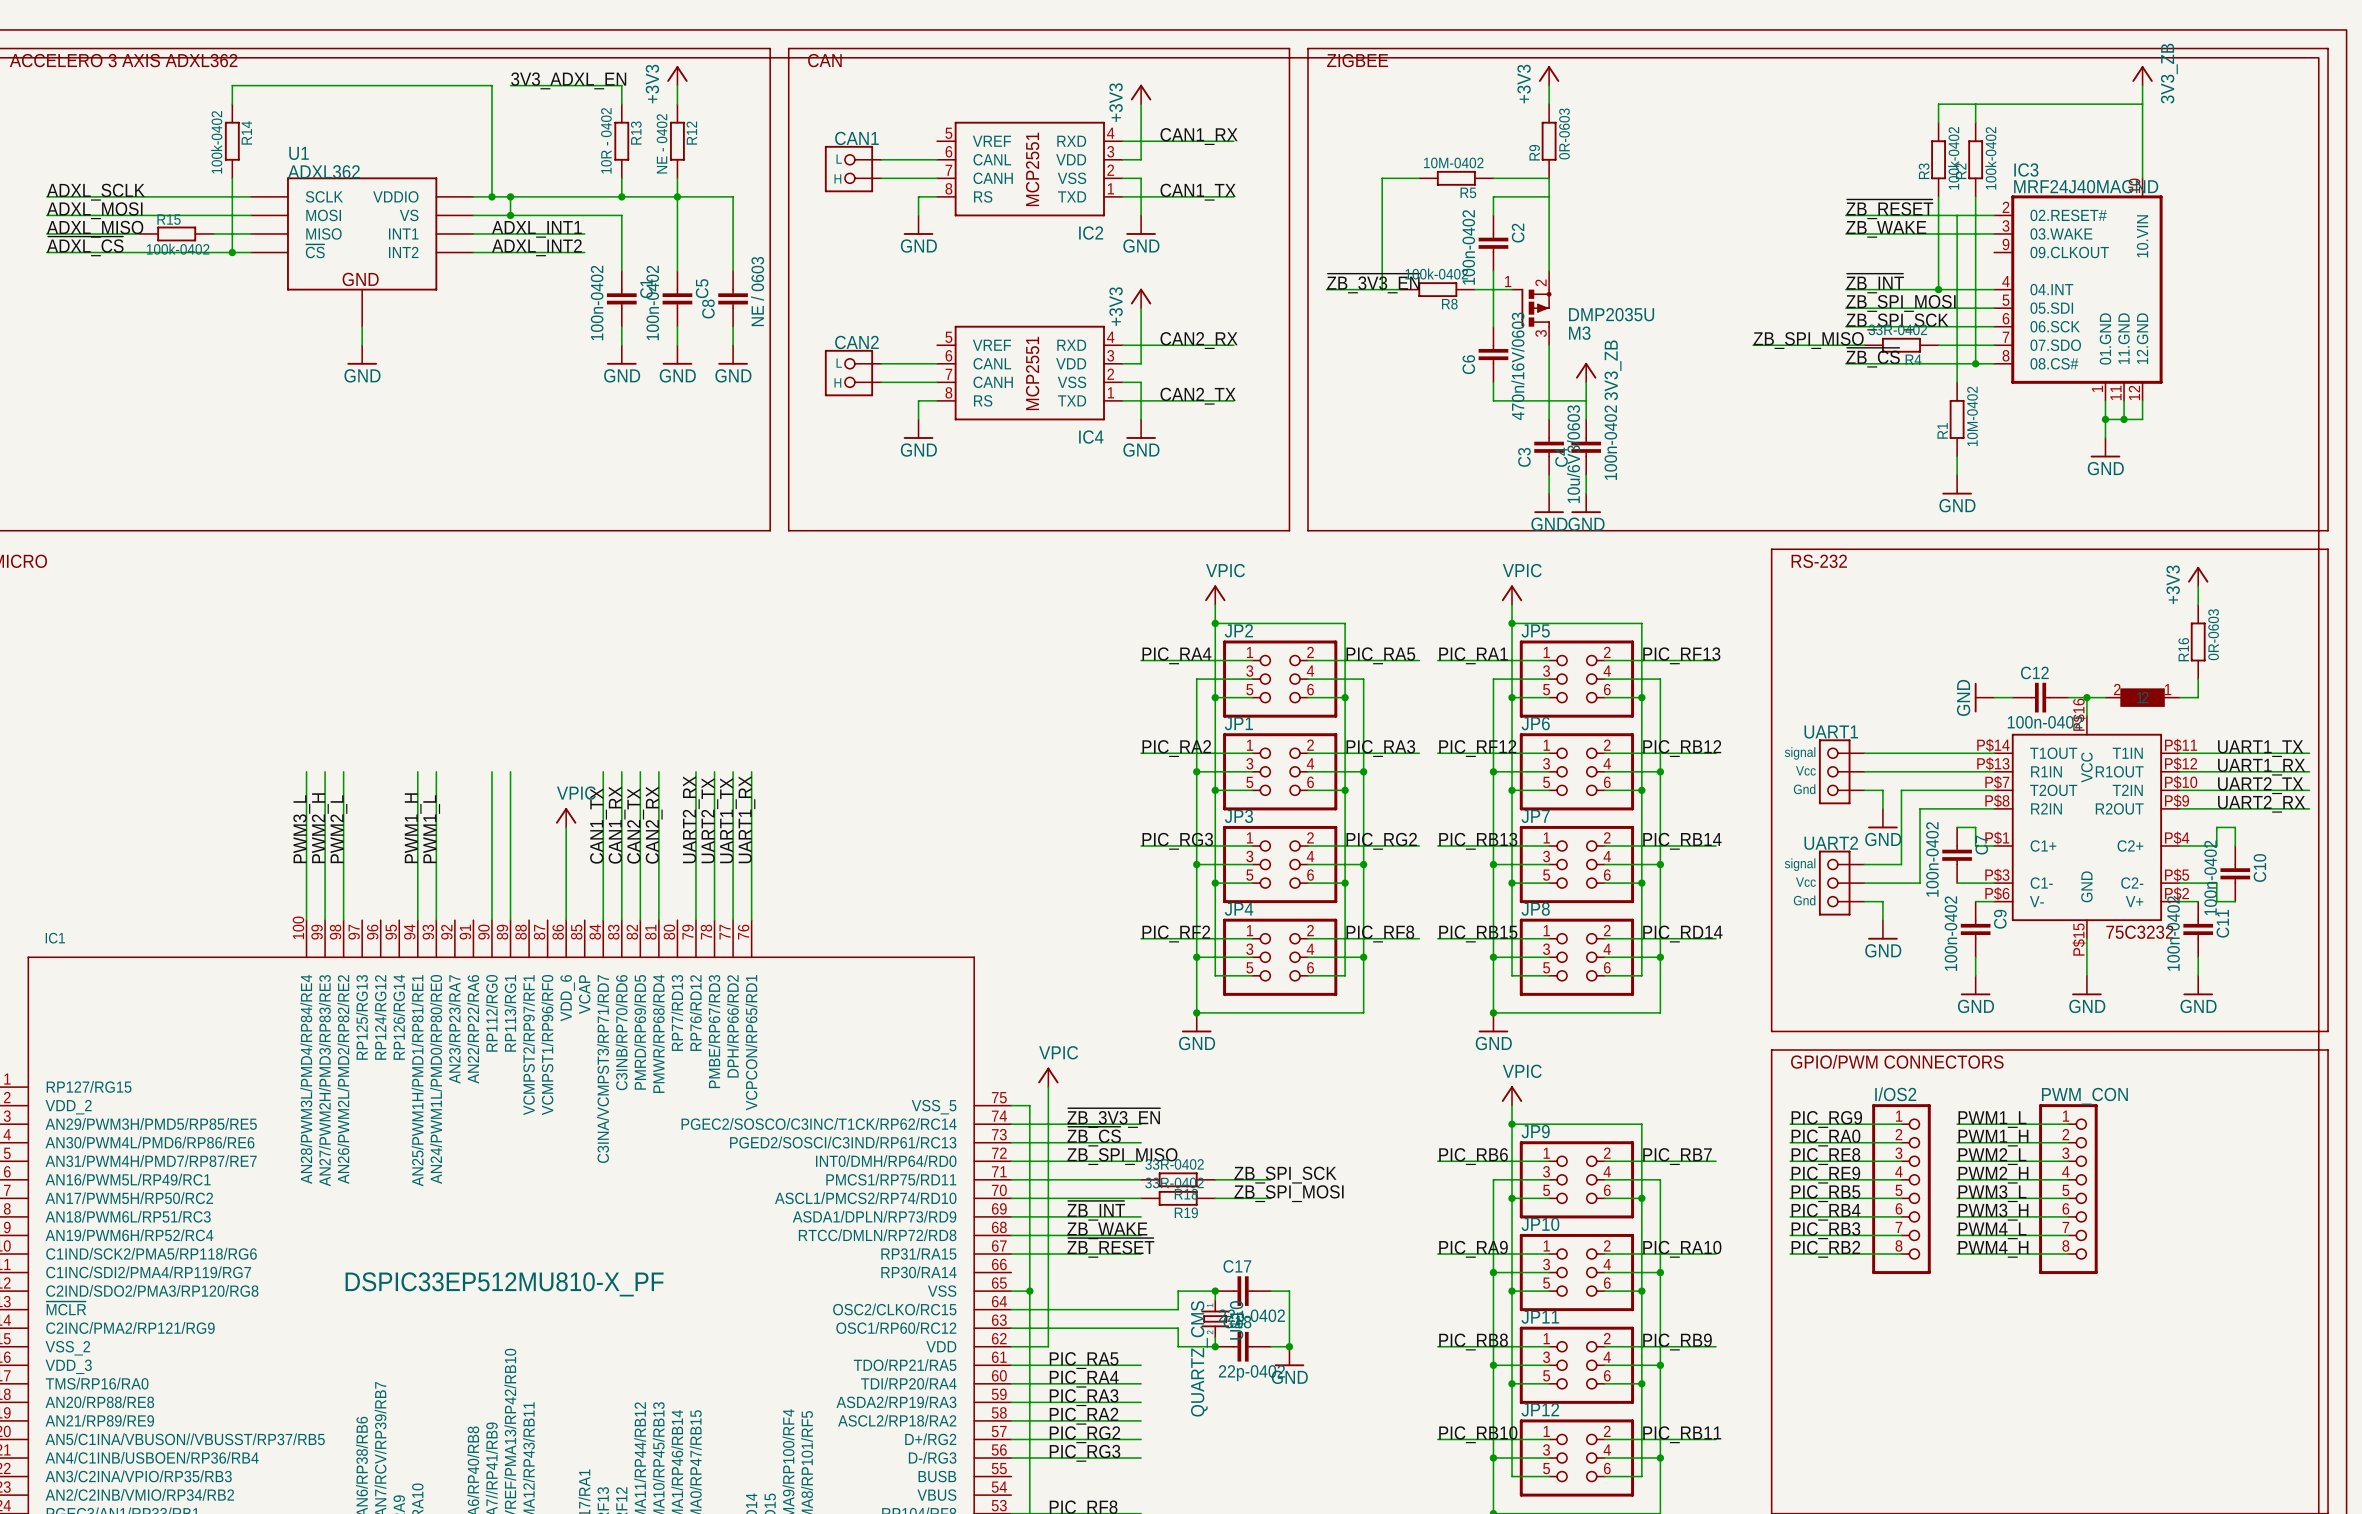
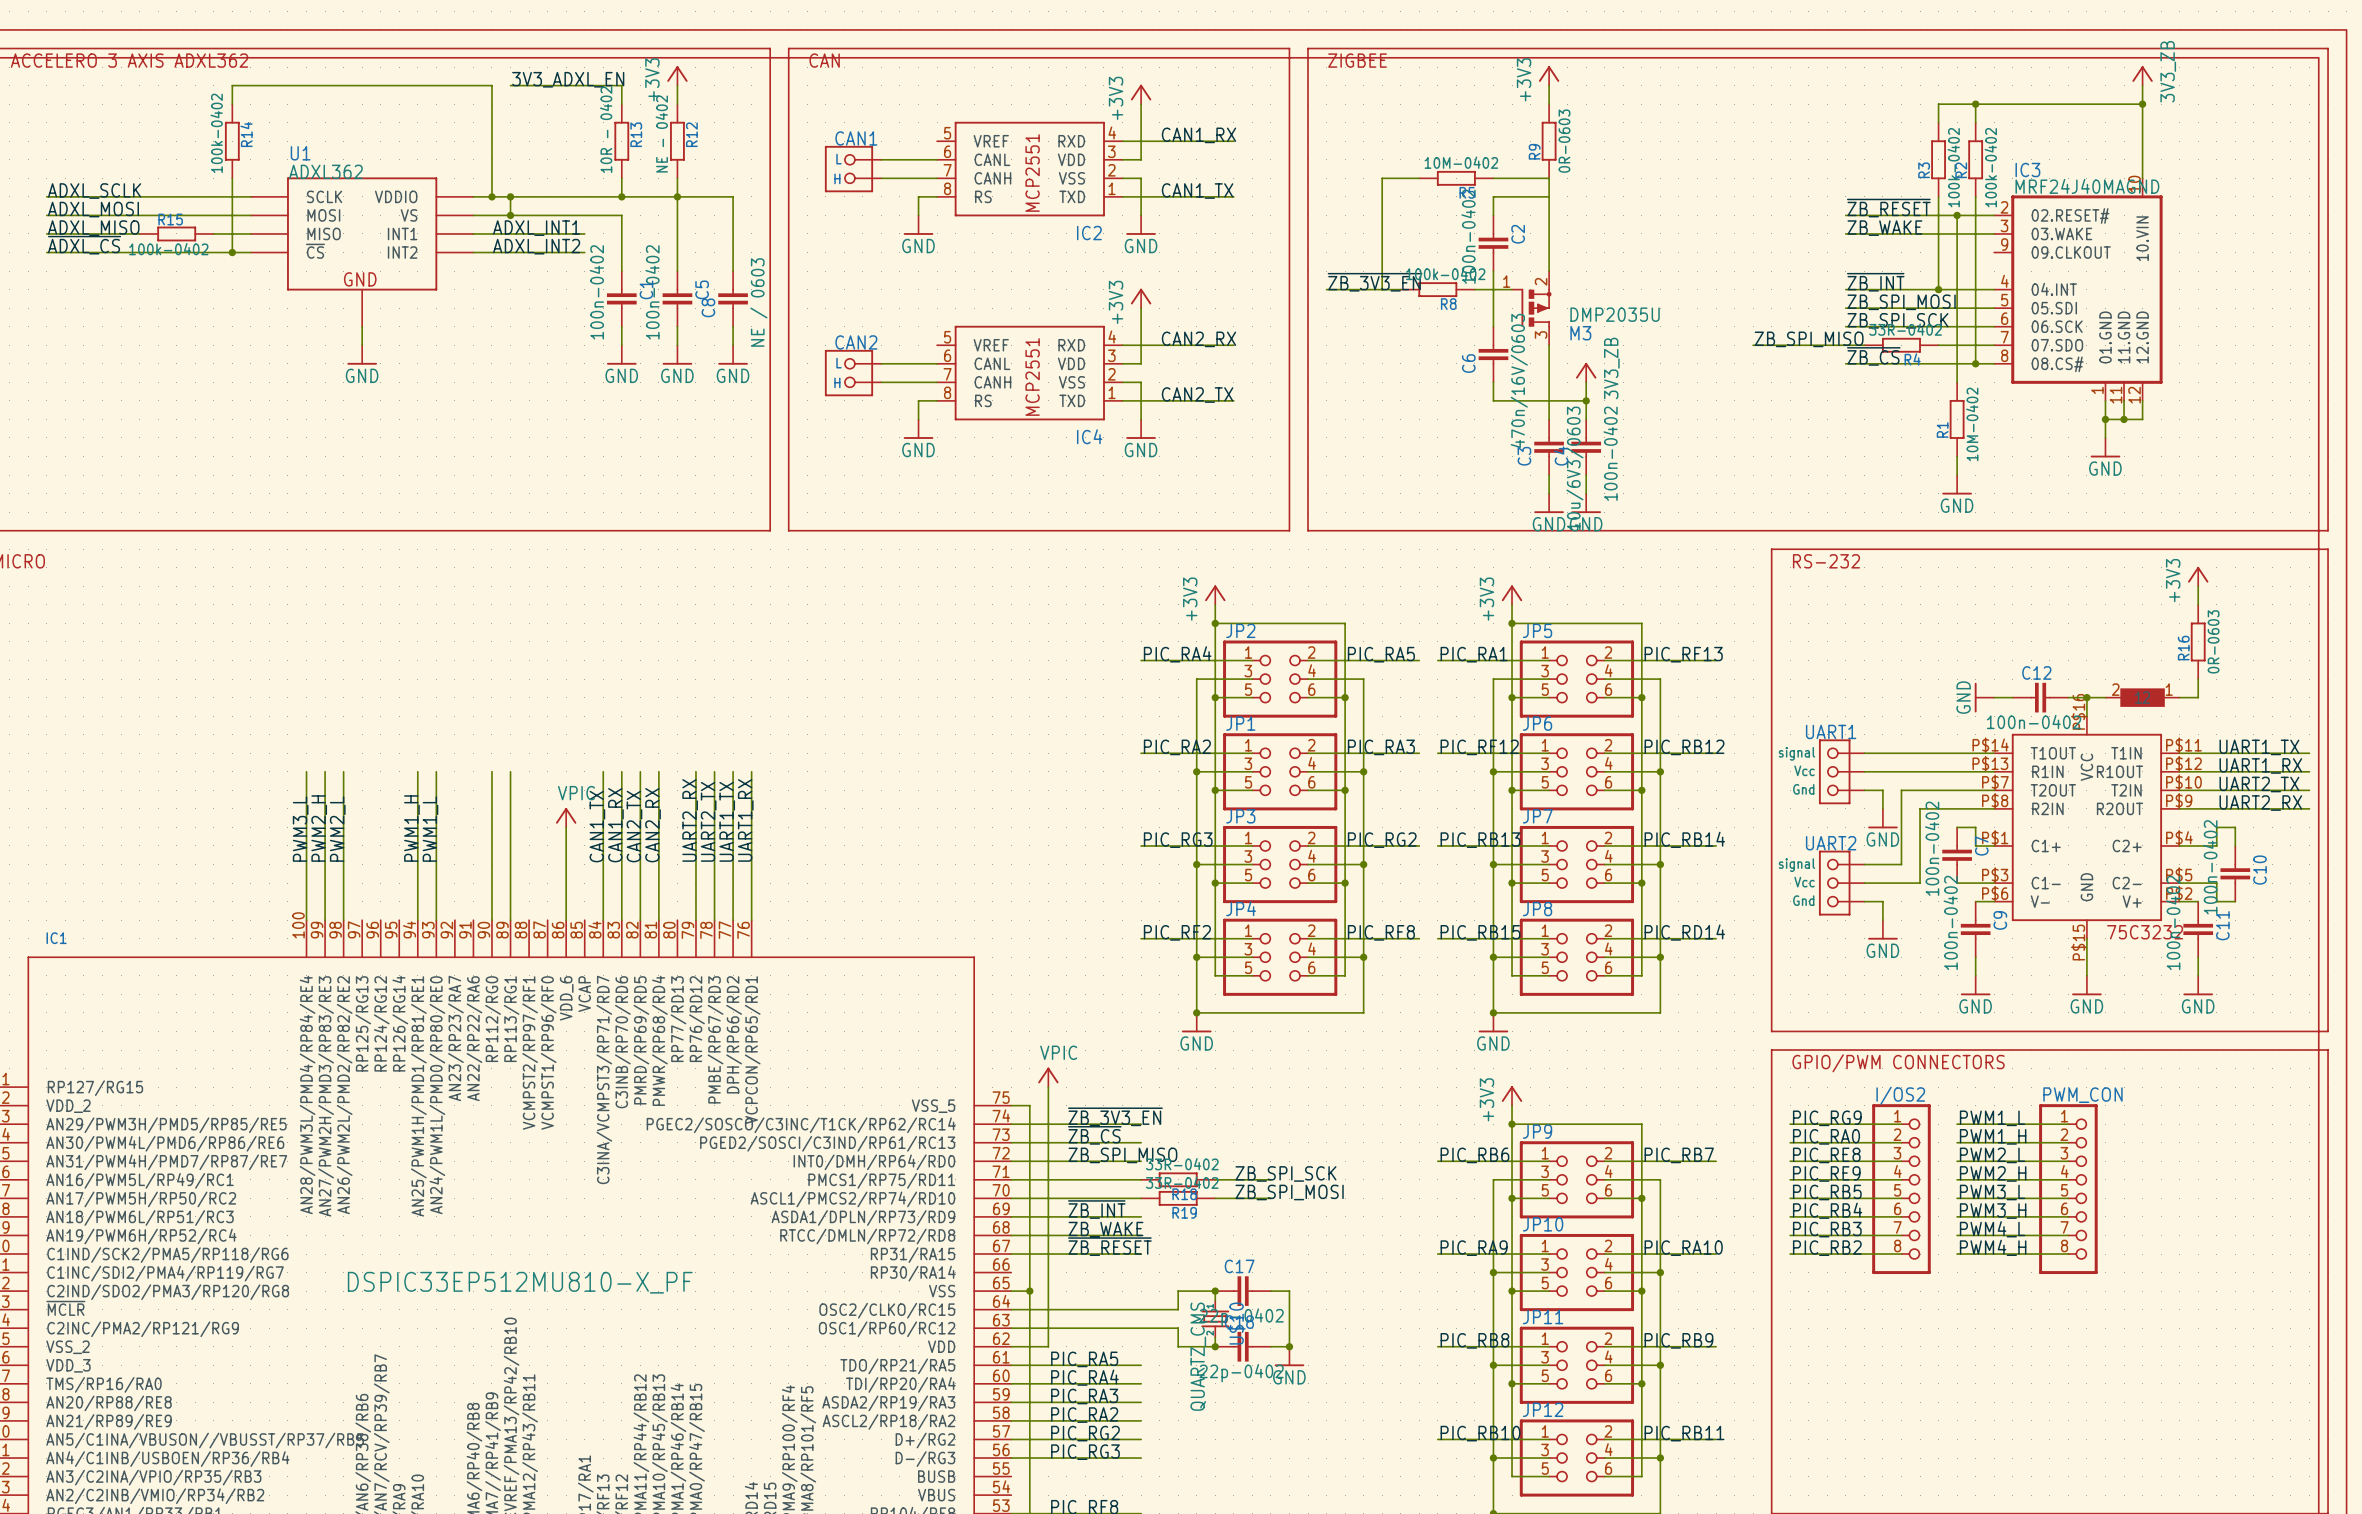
junction: none -> (1975, 104)
junction: none -> (2142, 104)
junction: none -> (1957, 215)
junction: none -> (1586, 400)
power symbol: VPIC (1215, 595) -> +3V3 (1215, 595)
power symbol: VPIC (1512, 595) -> +3V3 (1512, 595)
power symbol: VPIC (1512, 1095) -> +3V3 (1512, 1095)

